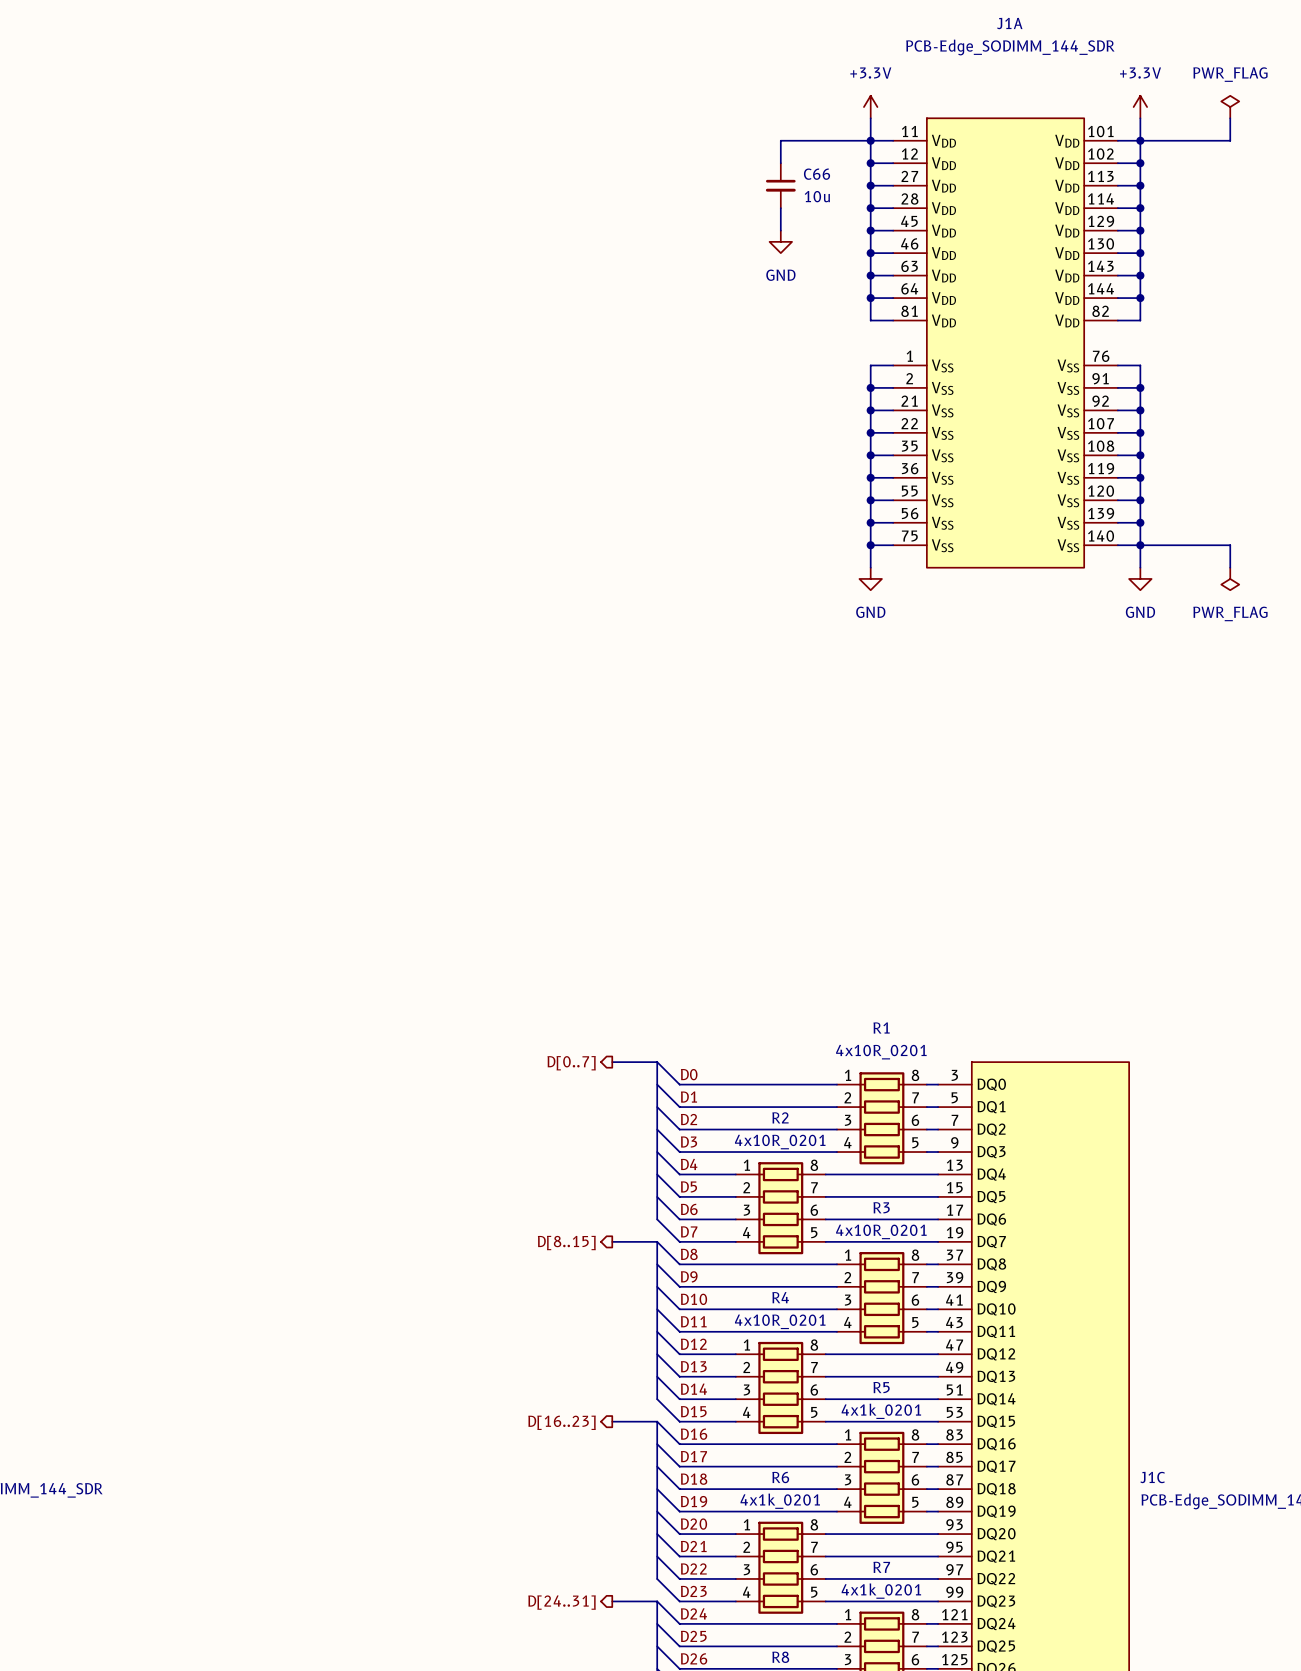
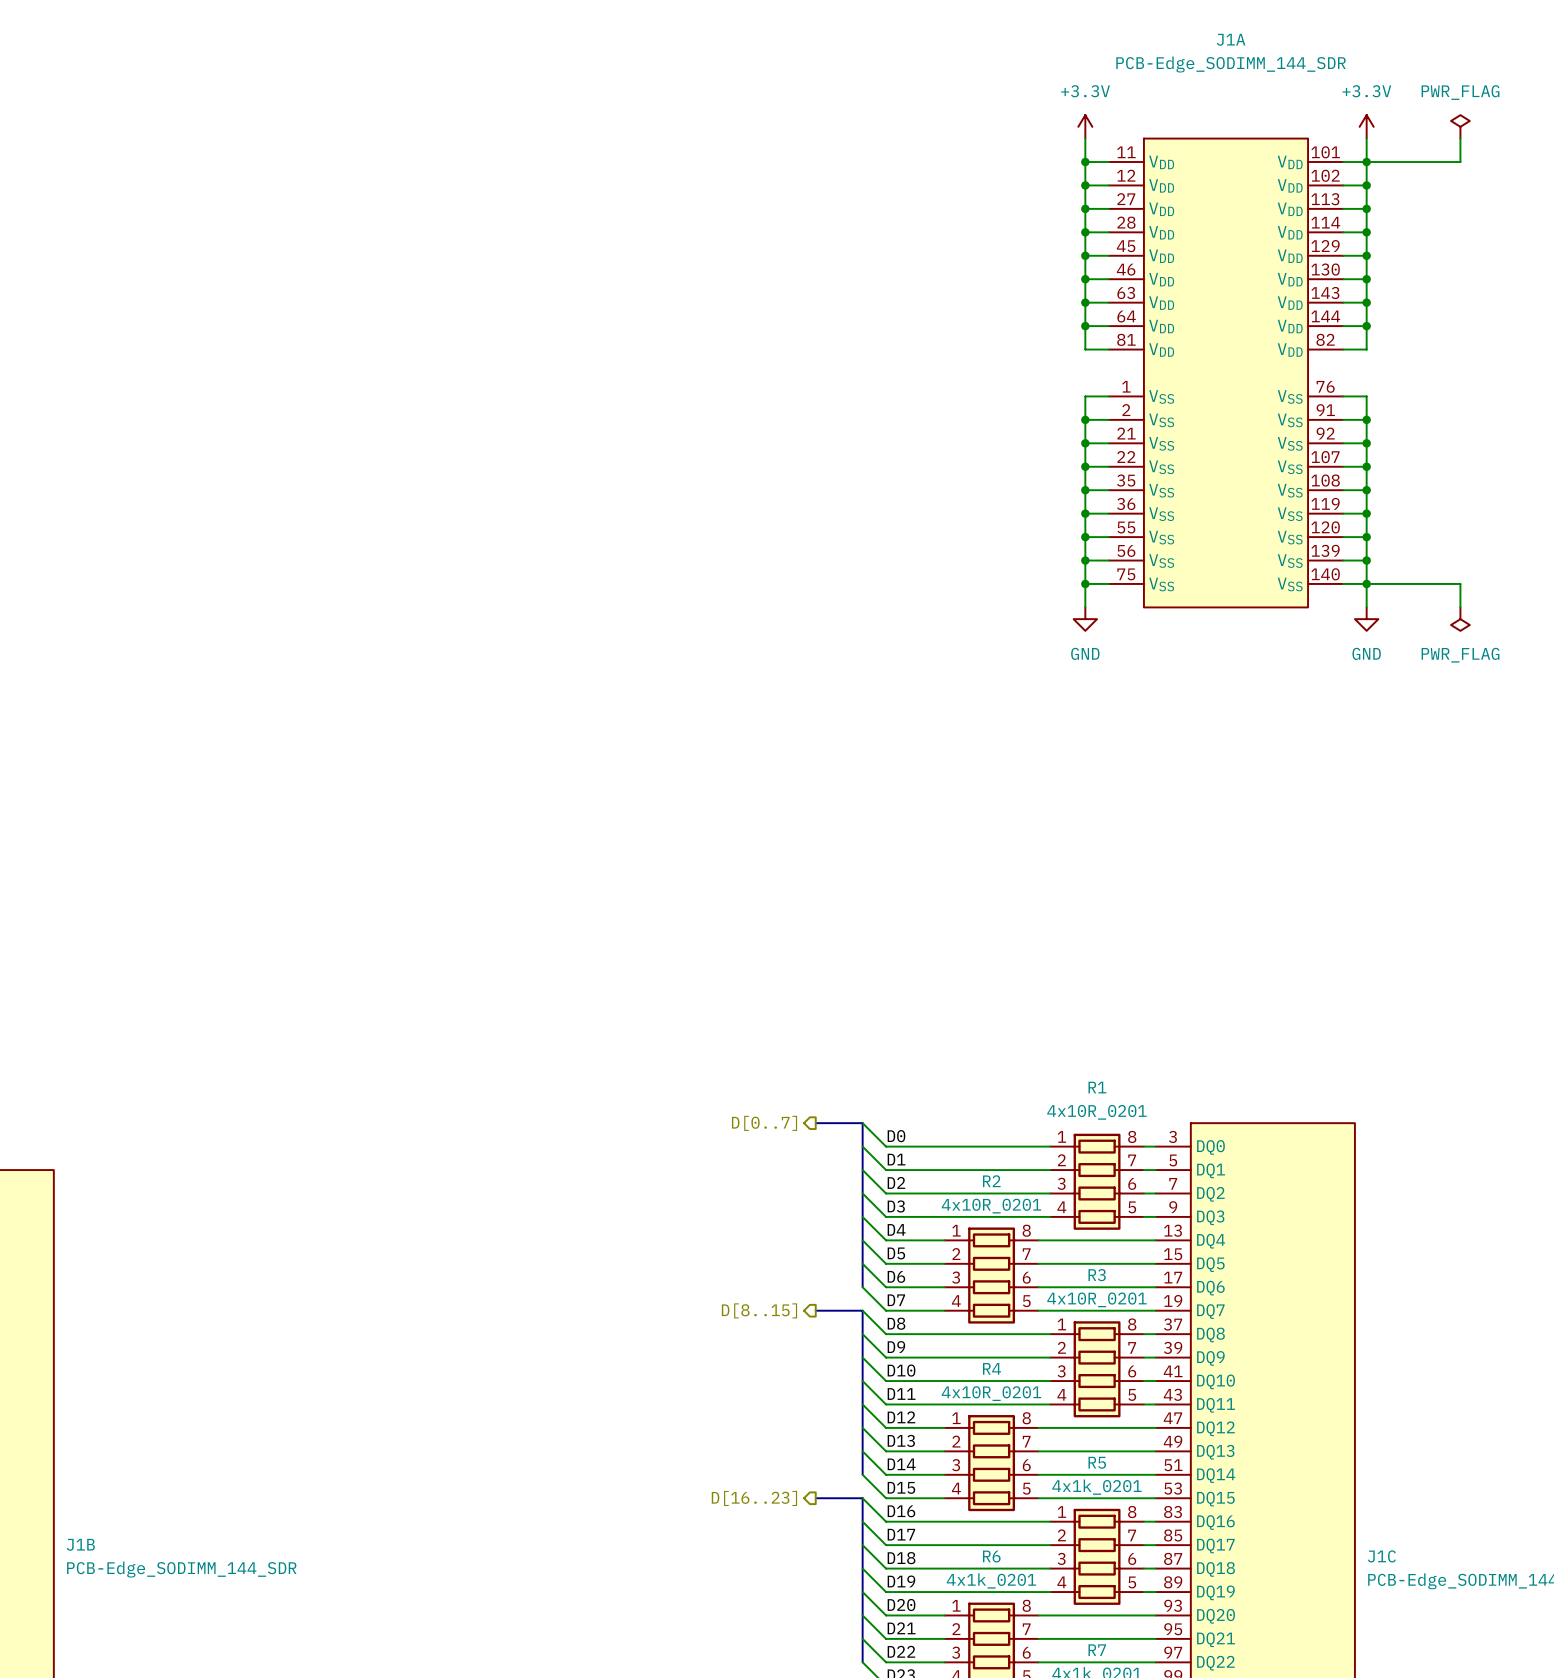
wire: (870, 140) (780, 140) (780, 163) -> none
C66: (780, 185) -> none
wire: (780, 208) (780, 230) -> none
power symbol: GND (780, 241) -> none

